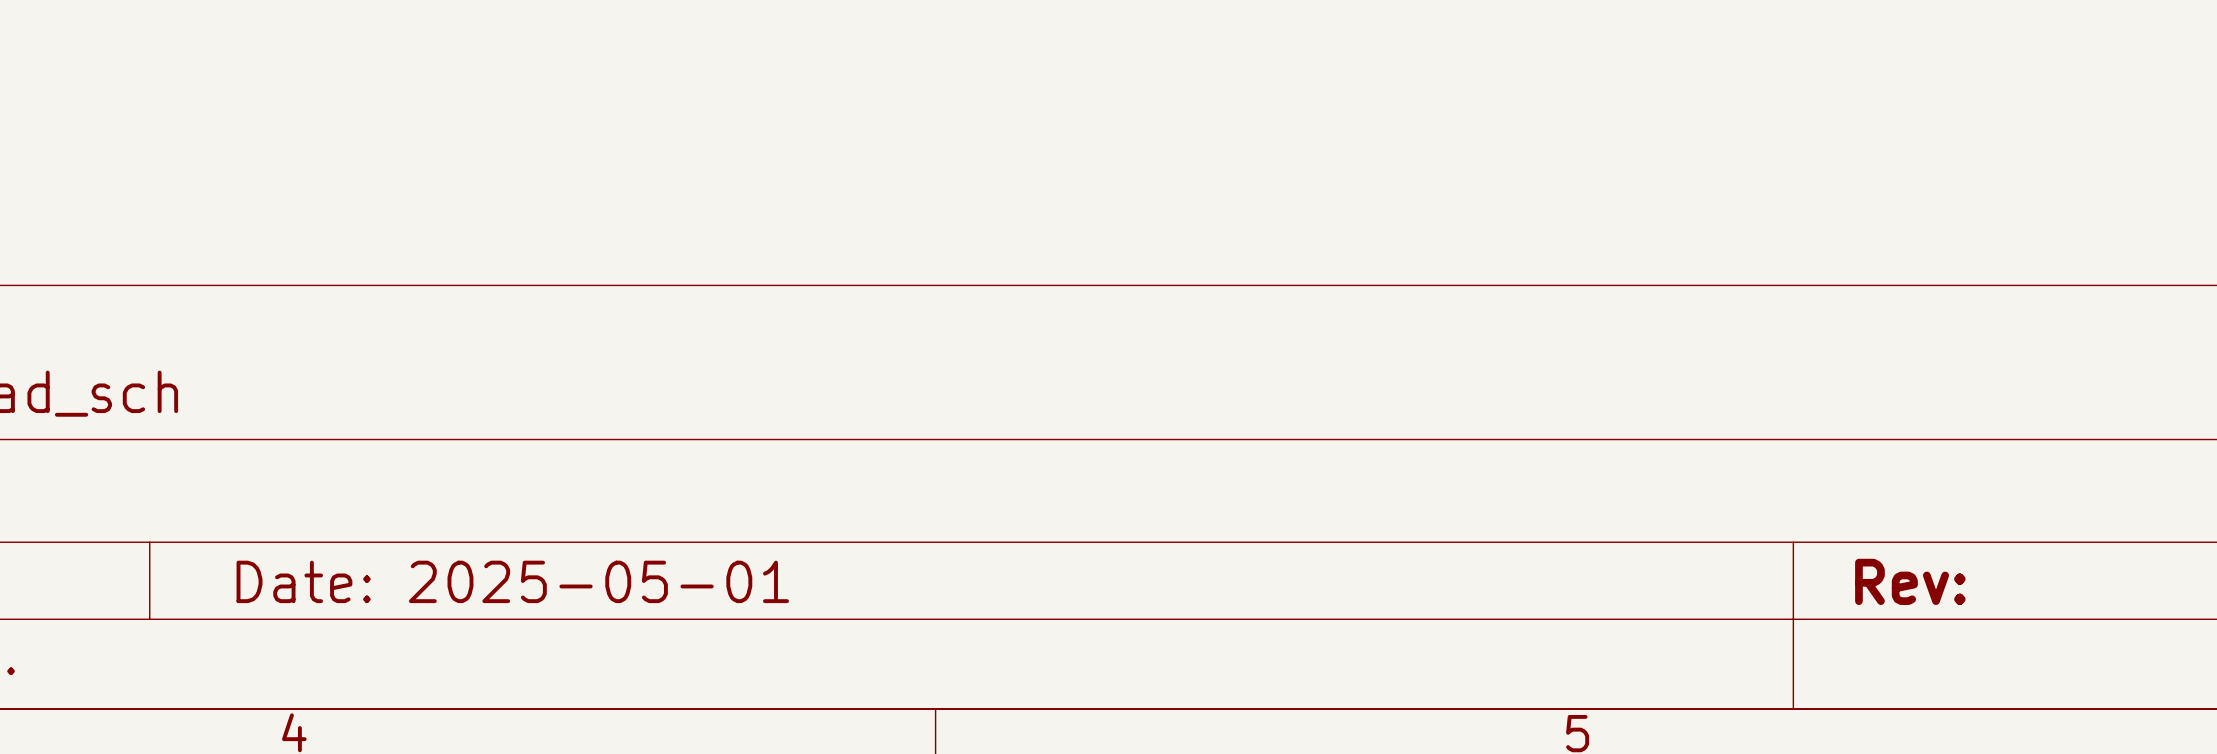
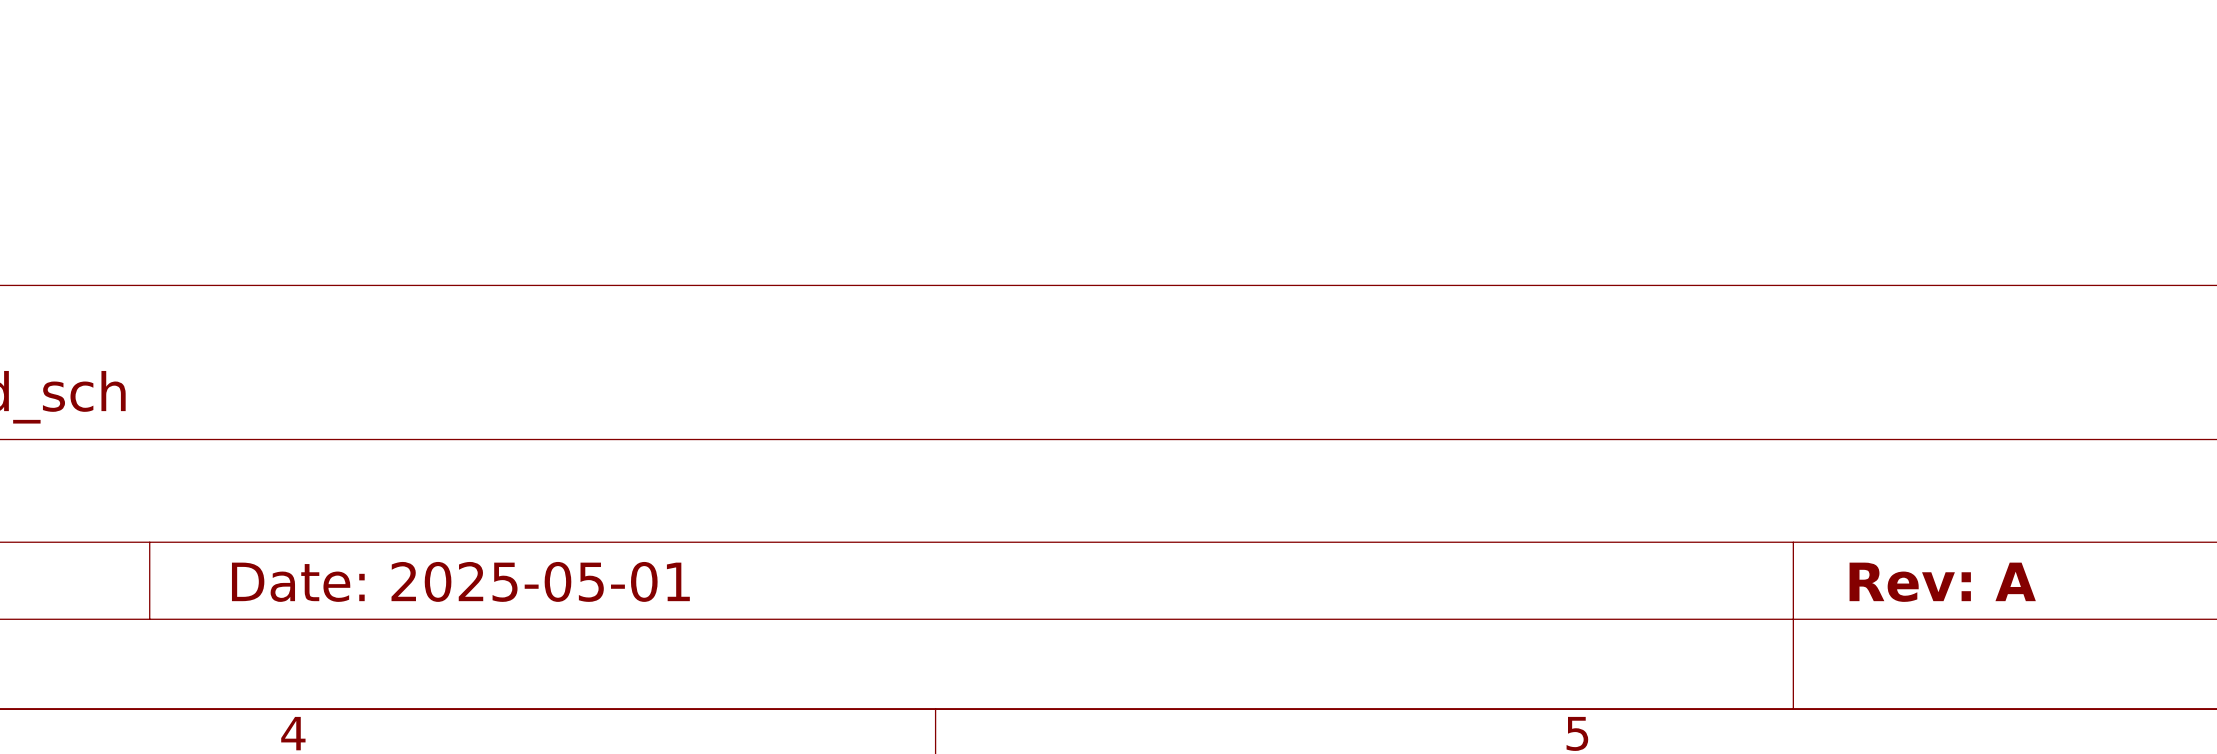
title block: Rev: (1910, 581) -> Rev: A (1942, 582)

